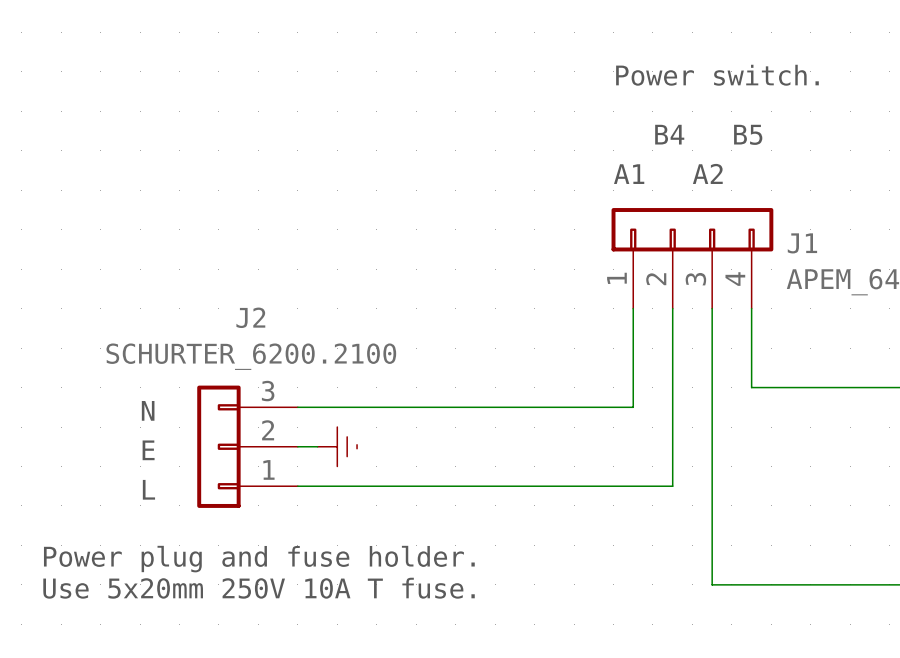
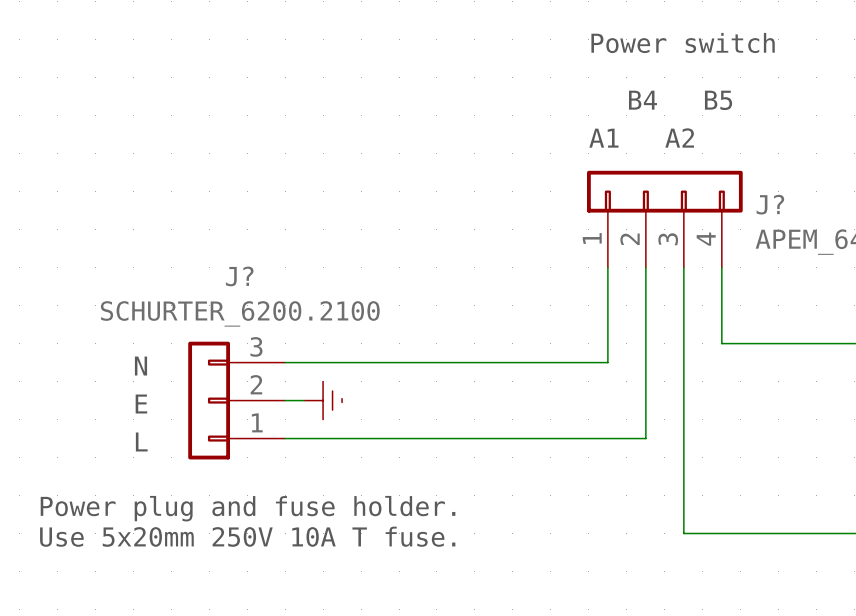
text: Power switch. (717, 75) -> Power switch (683, 42)
J1 name: J1 (802, 243) -> J? (770, 204)
J2 name: J2 (250, 317) -> J? (239, 276)

